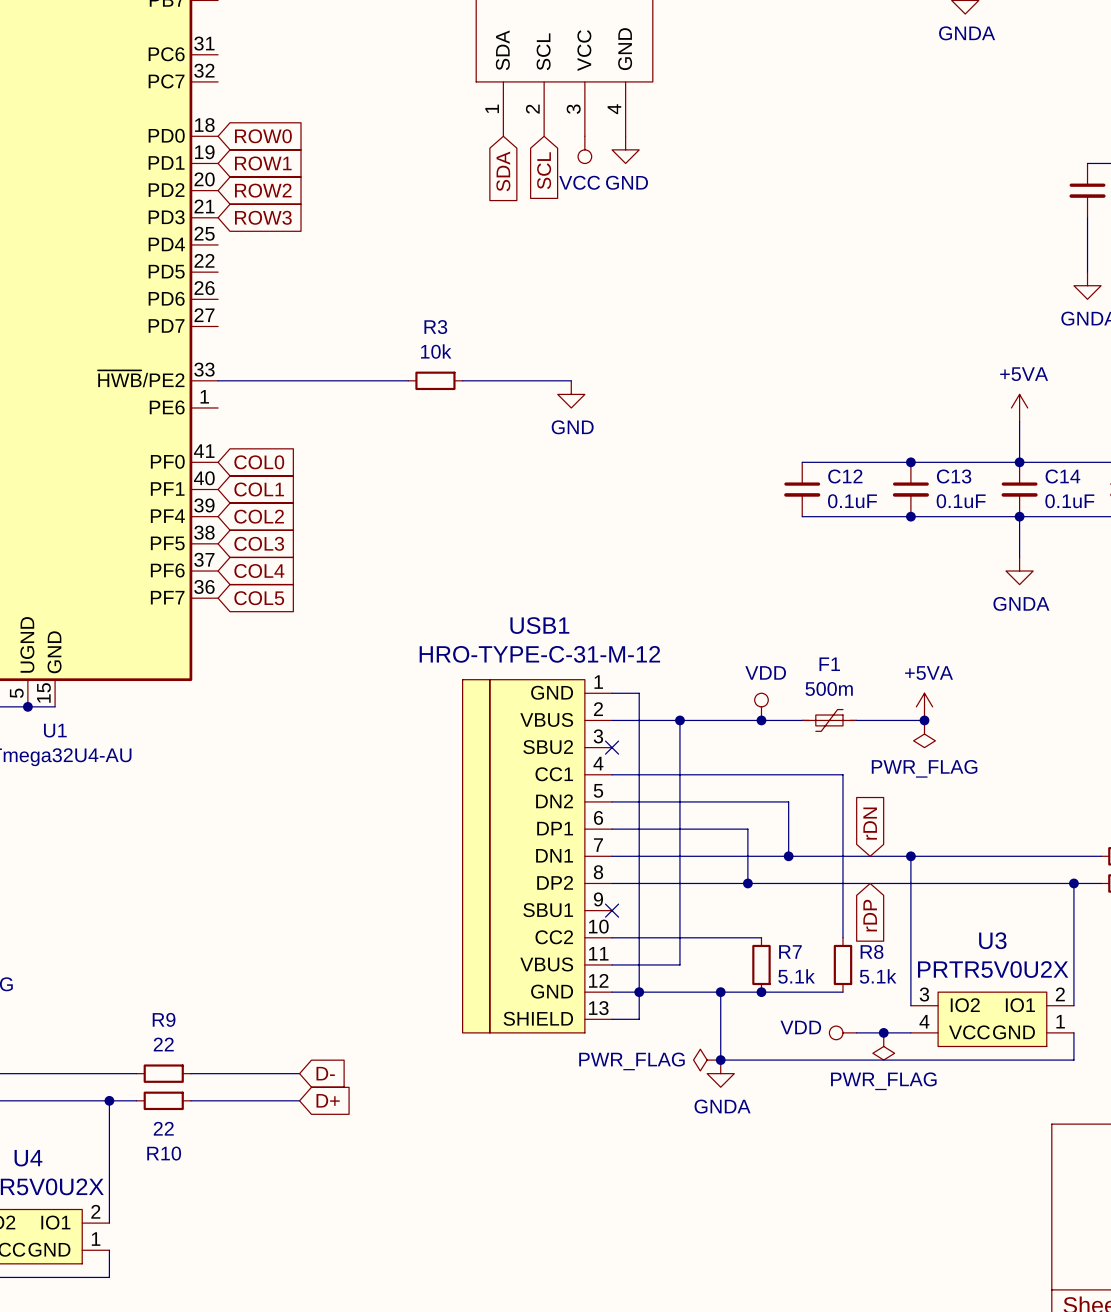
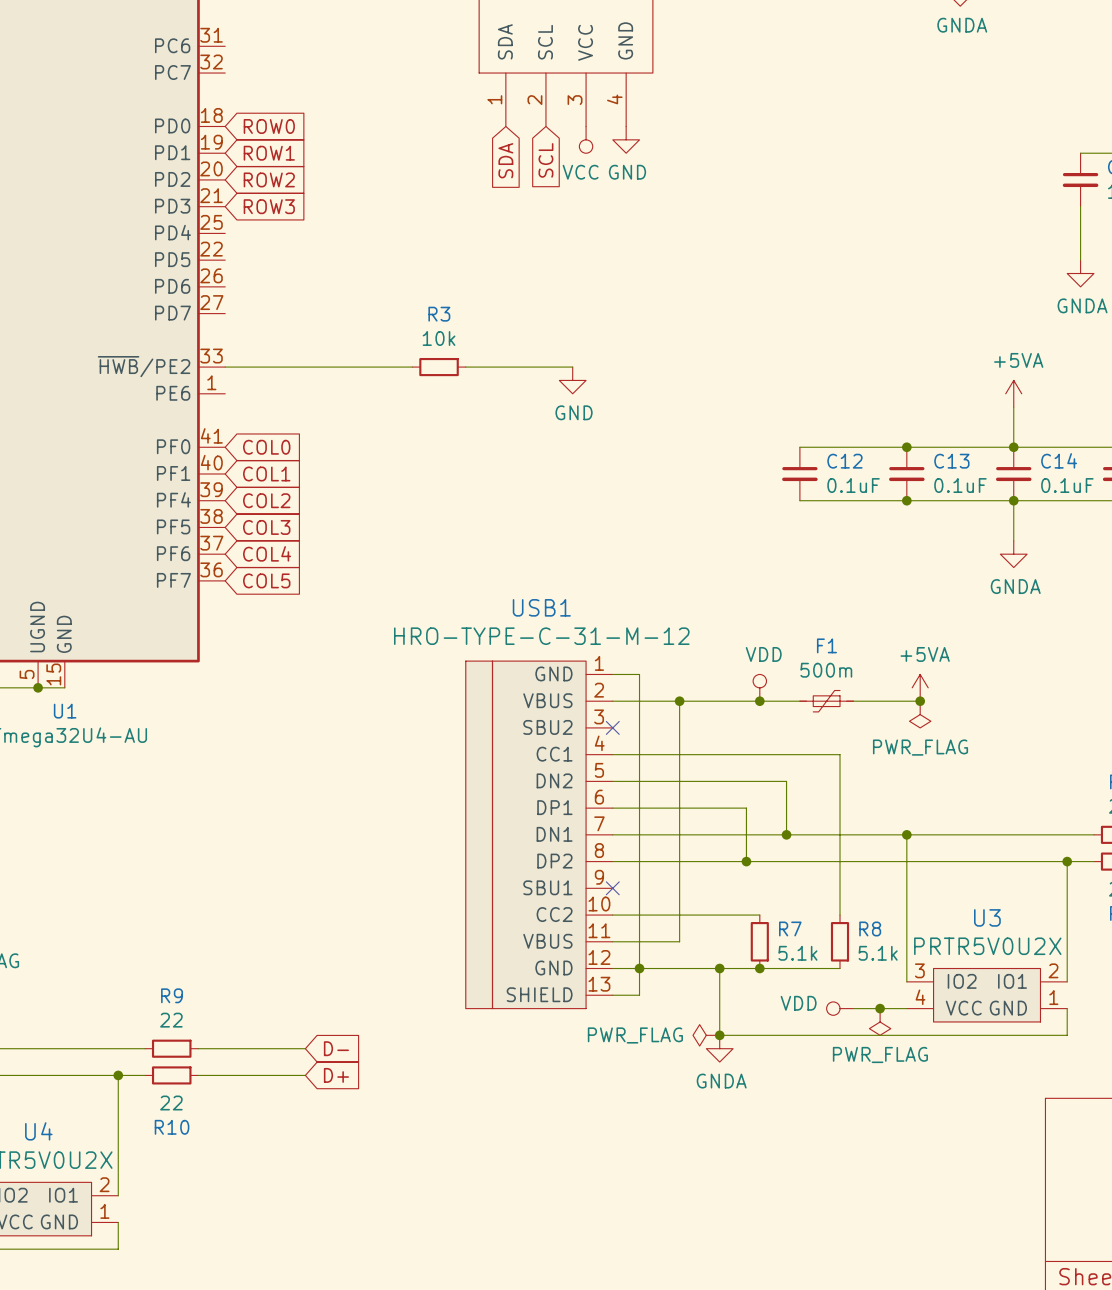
global label: rDN (870, 823) -> none
global label: rDP (870, 915) -> none

